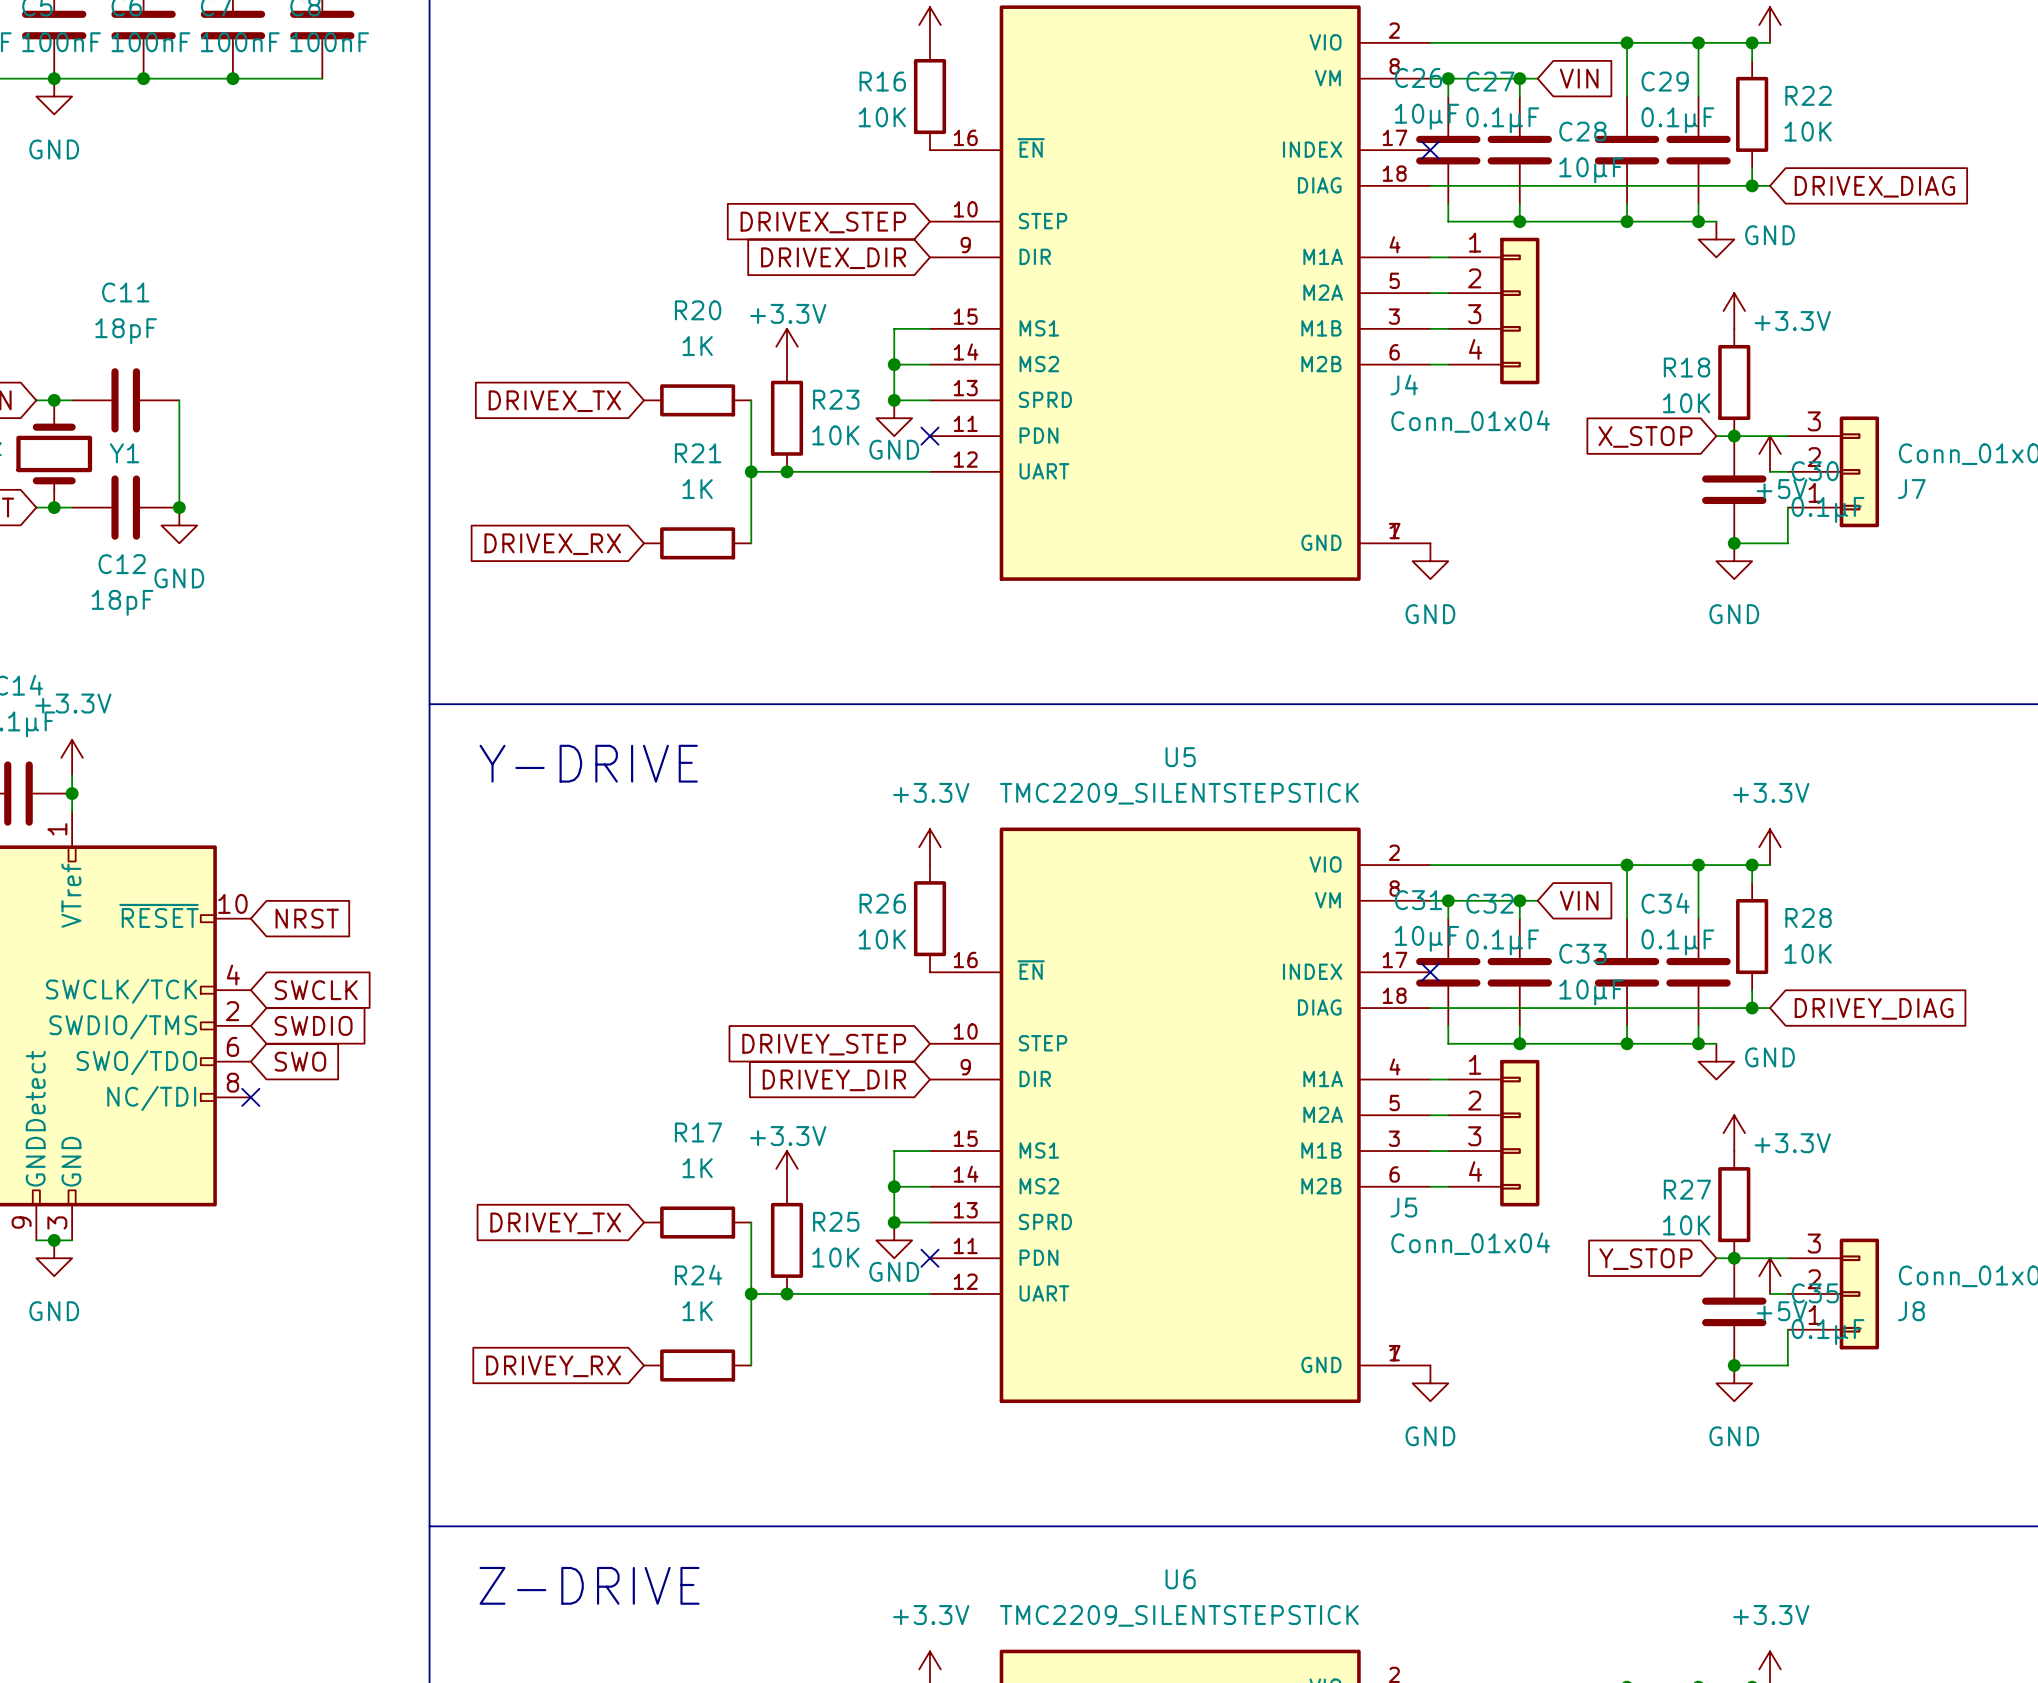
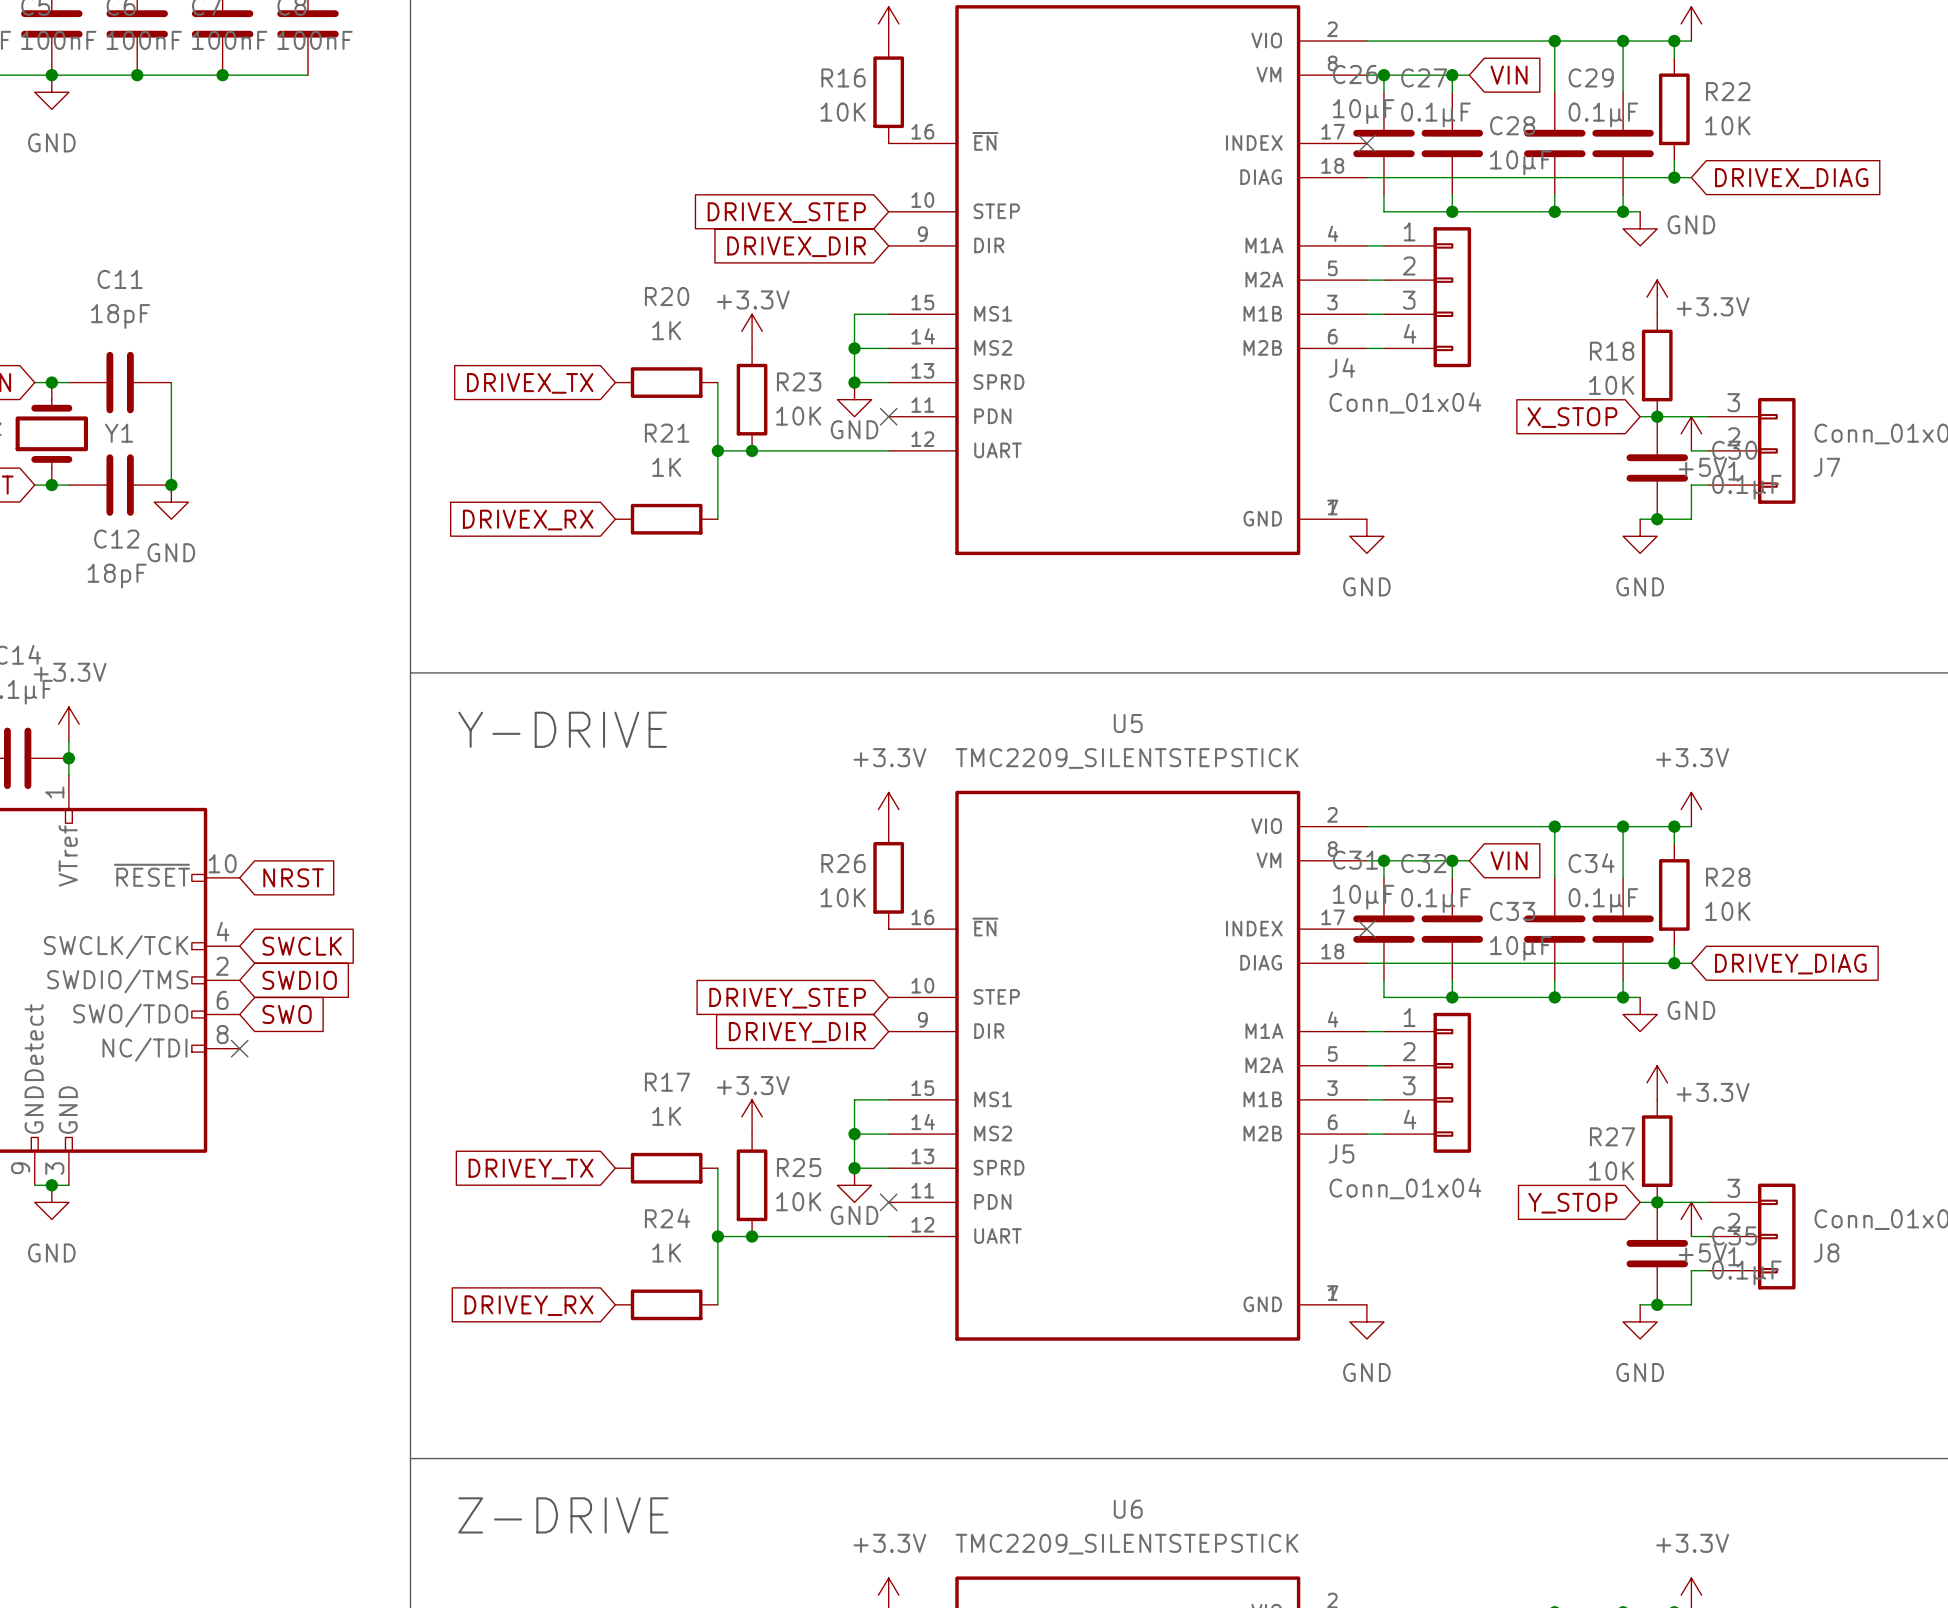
wire: (1787, 507) (1787, 543) (1770, 543) -> (1708, 485) (1691, 485) (1691, 519)
wire: none -> (1640, 519) (1657, 519)
power symbol position: GND (1734, 561) -> GND (1640, 536)
wire: (1787, 1329) (1787, 1365) (1770, 1365) -> (1708, 1270) (1691, 1270) (1691, 1304)
wire: none -> (1640, 1304) (1657, 1304)
power symbol position: GND (1734, 1383) -> GND (1640, 1321)

